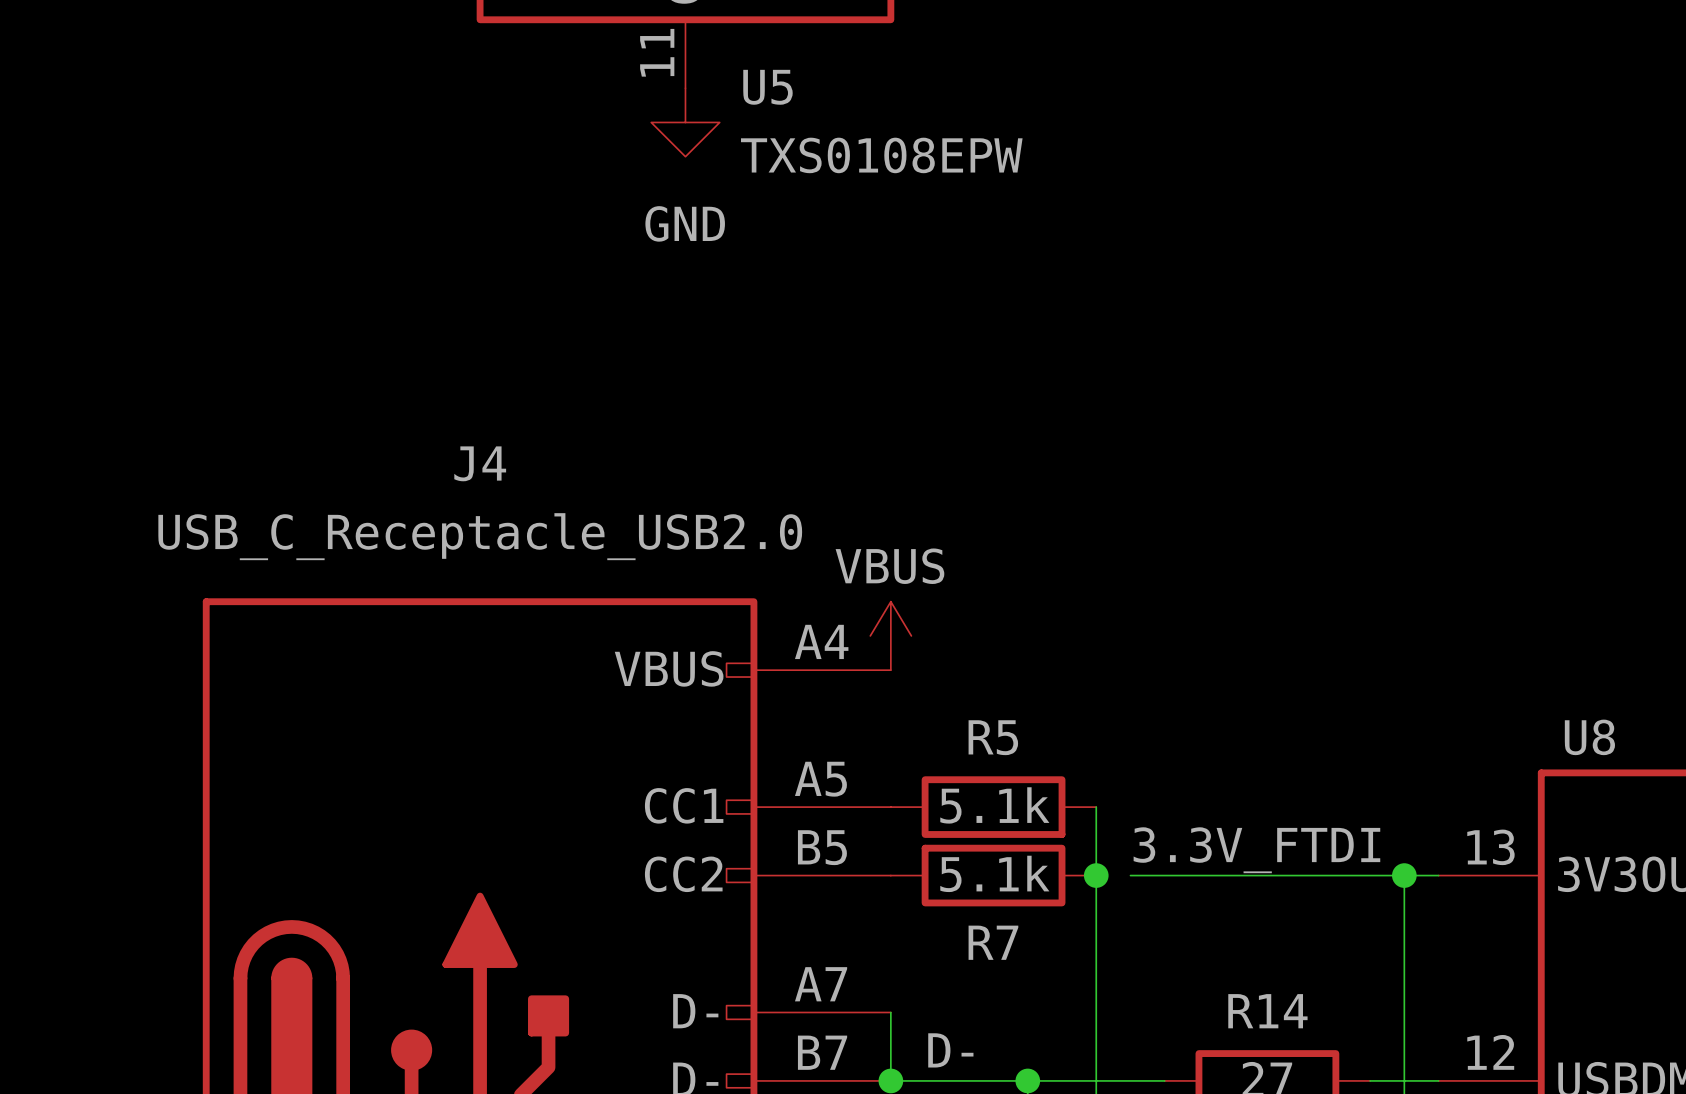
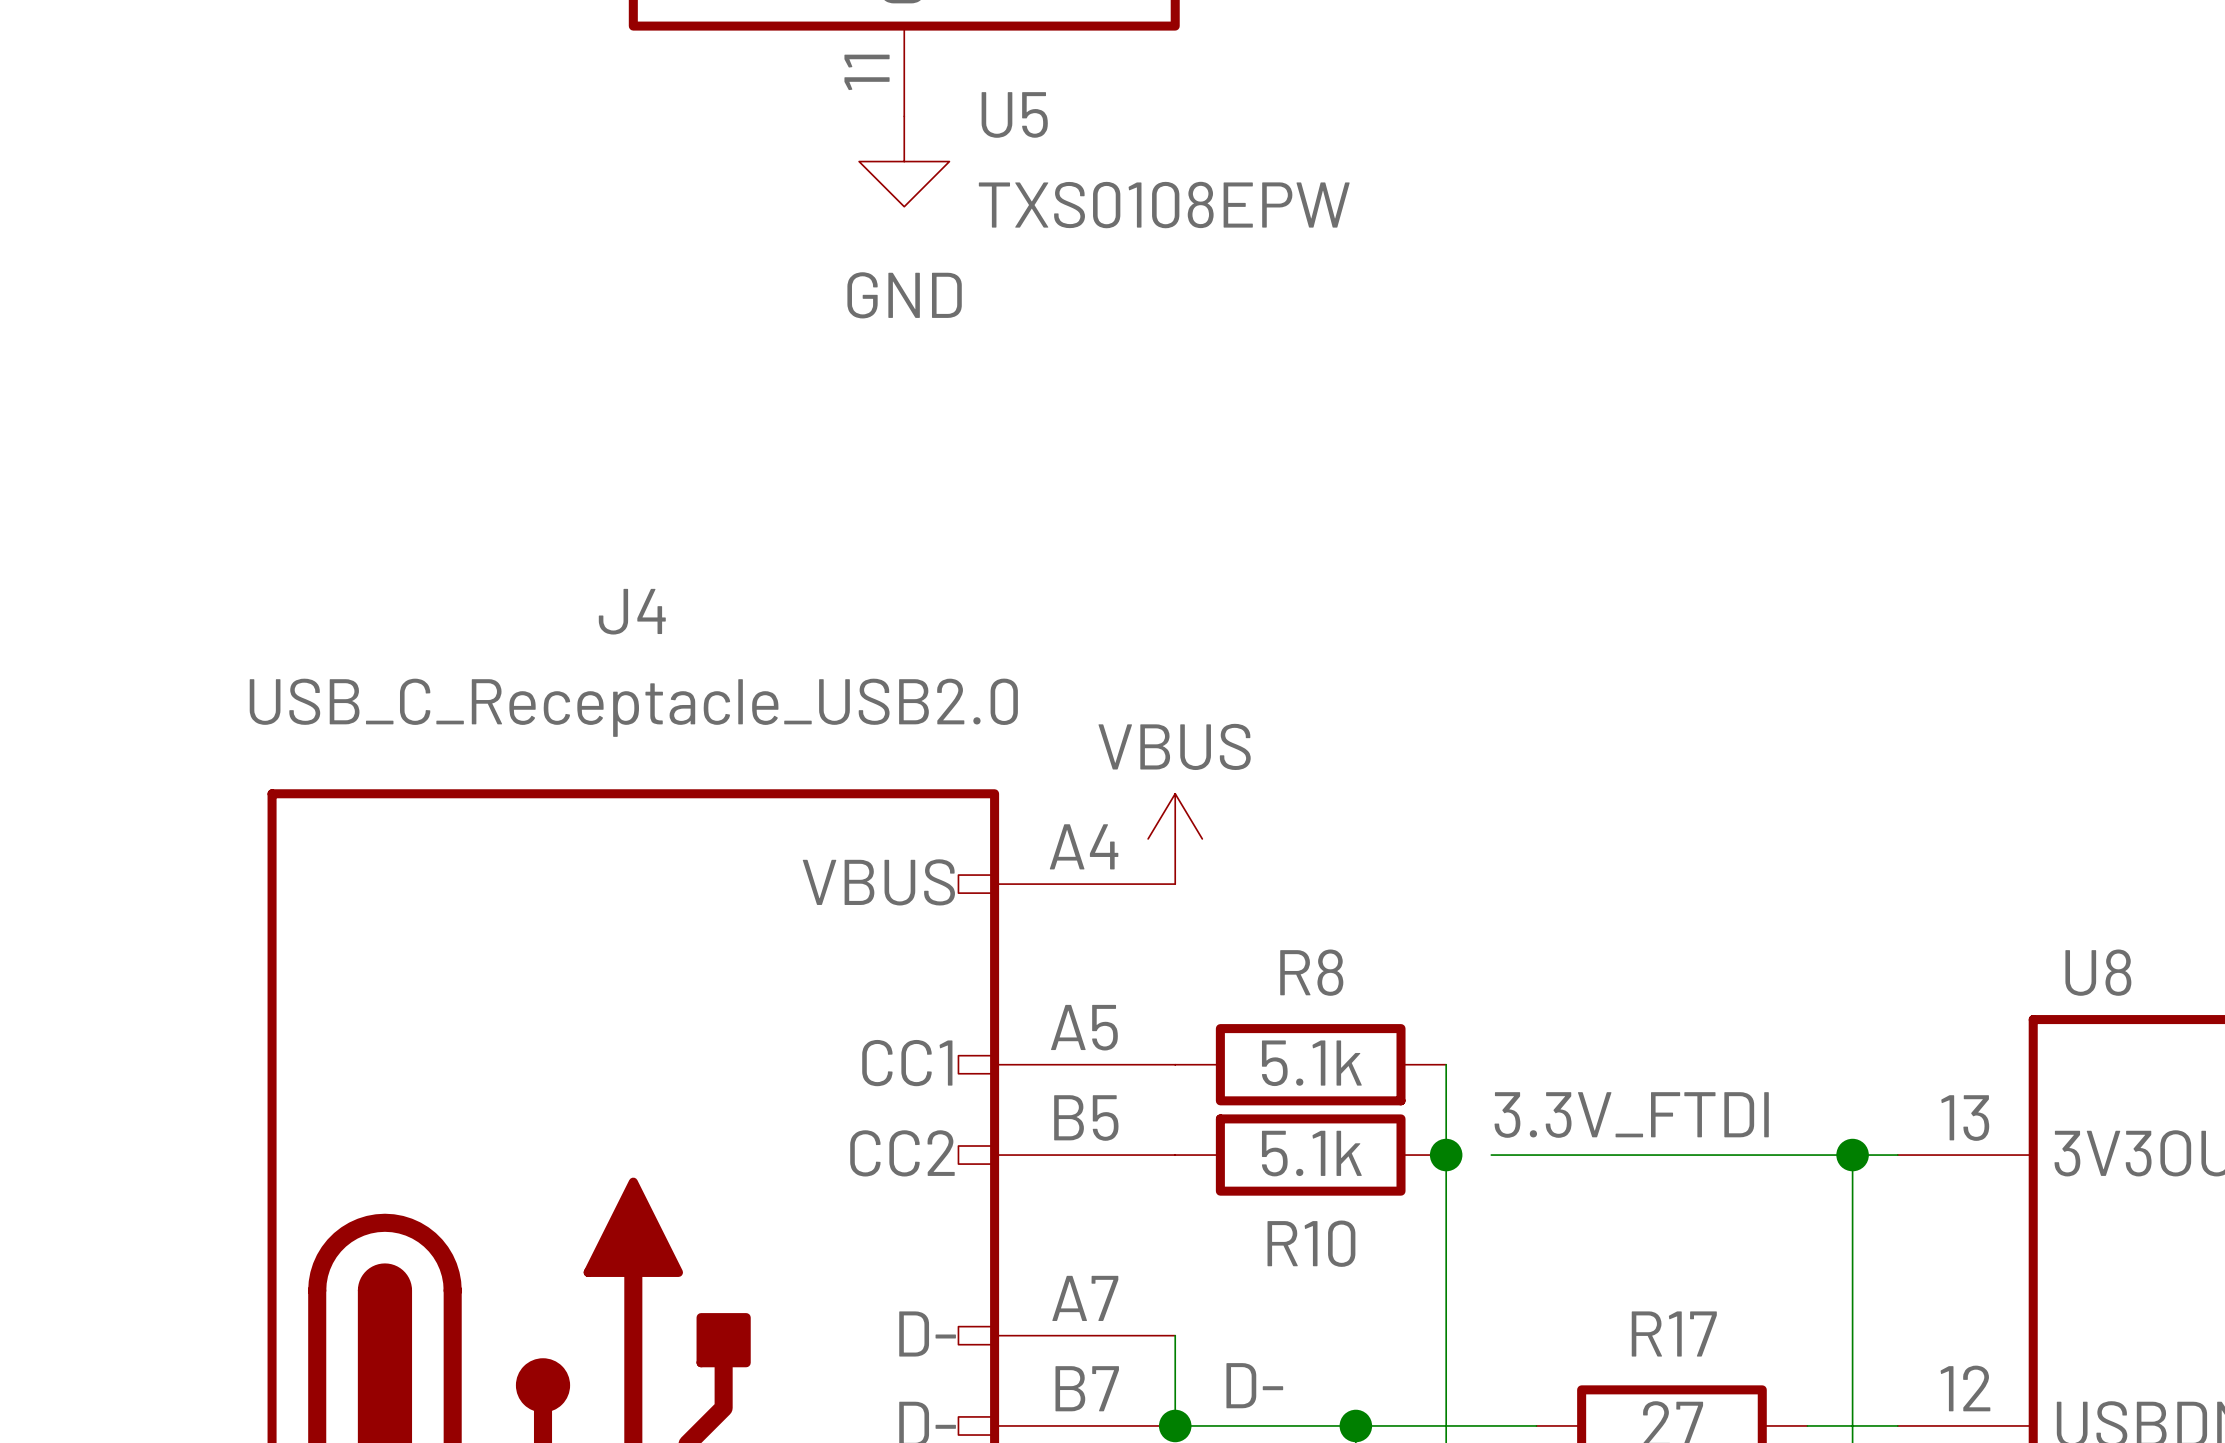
R5 name: R5 (993, 737) -> R8 (1311, 972)
R7 name: R7 (993, 942) -> R10 (1311, 1243)
R14 name: R14 (1267, 1011) -> R17 (1674, 1333)

